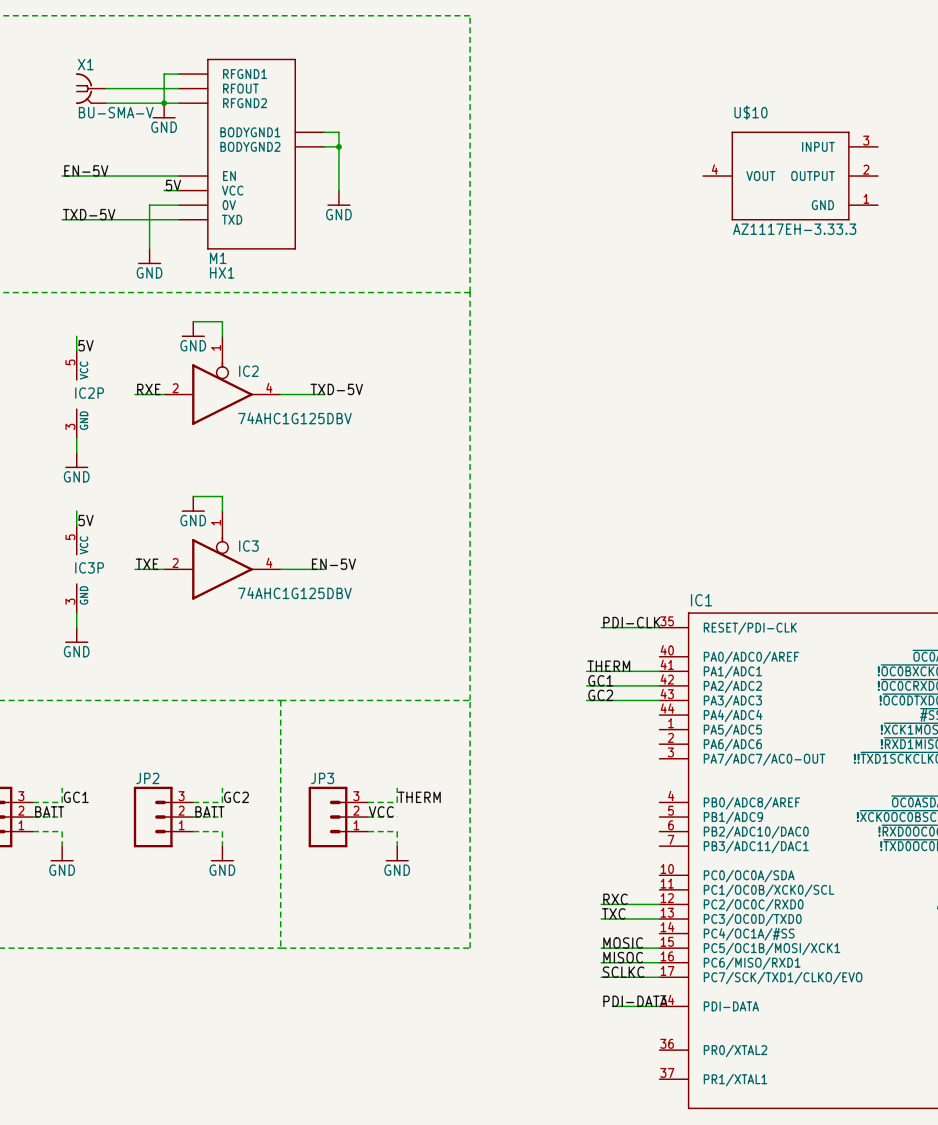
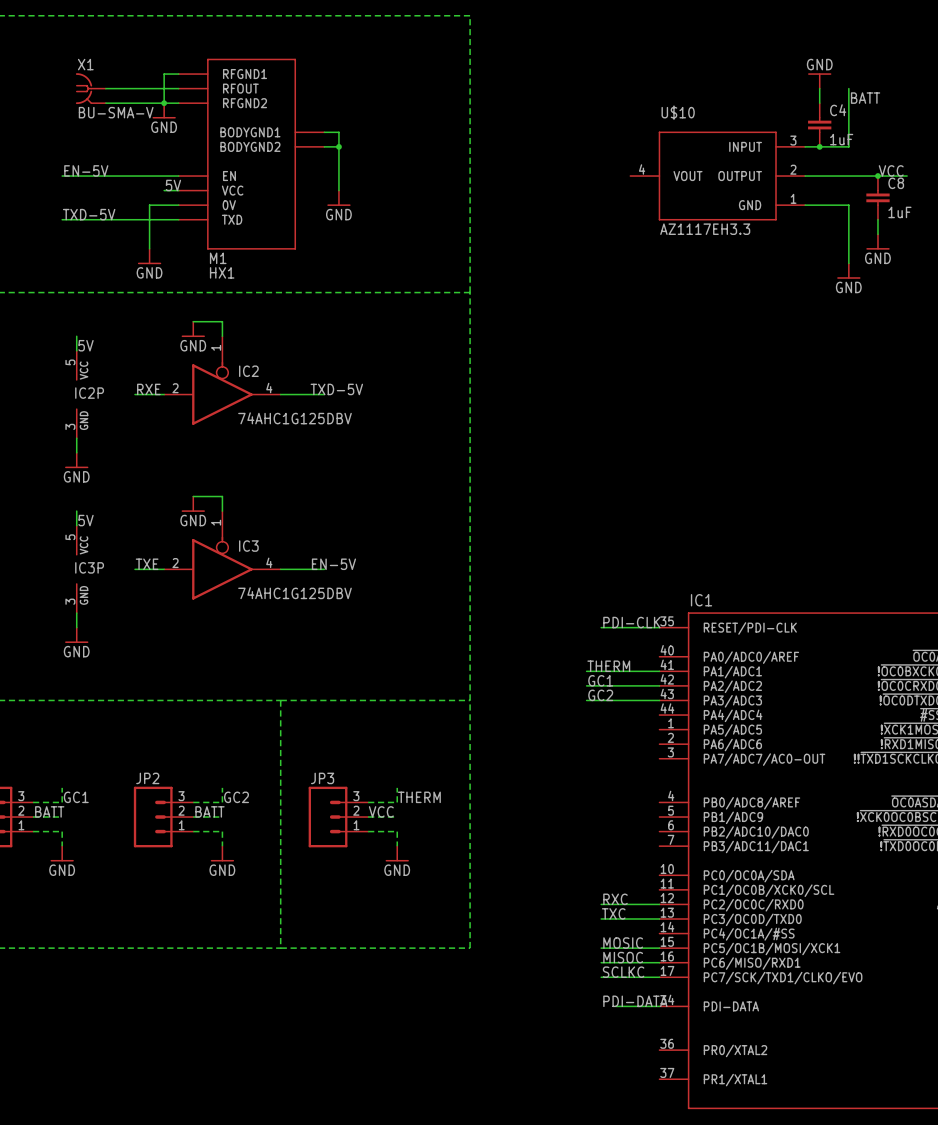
power symbol: none -> GND (819, 80)
wire: none -> (819, 88) (819, 103)
wire: none -> (848, 88) (848, 146) (805, 146)
label: none -> BATT (865, 98)
C4: none -> 1uF (819, 125)
junction: none -> (819, 146)
label: none -> VCC (891, 170)
U$10 position: (790, 176) -> (717, 176)
wire: none -> (805, 176) (907, 176)
junction: none -> (877, 176)
C8: none -> 1uF (877, 197)
wire: none -> (805, 205) (848, 205) (848, 263)
wire: none -> (877, 219) (877, 234)
U$10 value: AZ1117EH-3.33.3 (794, 229) -> AZ1117EH3.3 (705, 229)
power symbol: none -> GND (877, 241)
power symbol: none -> GND (848, 271)

